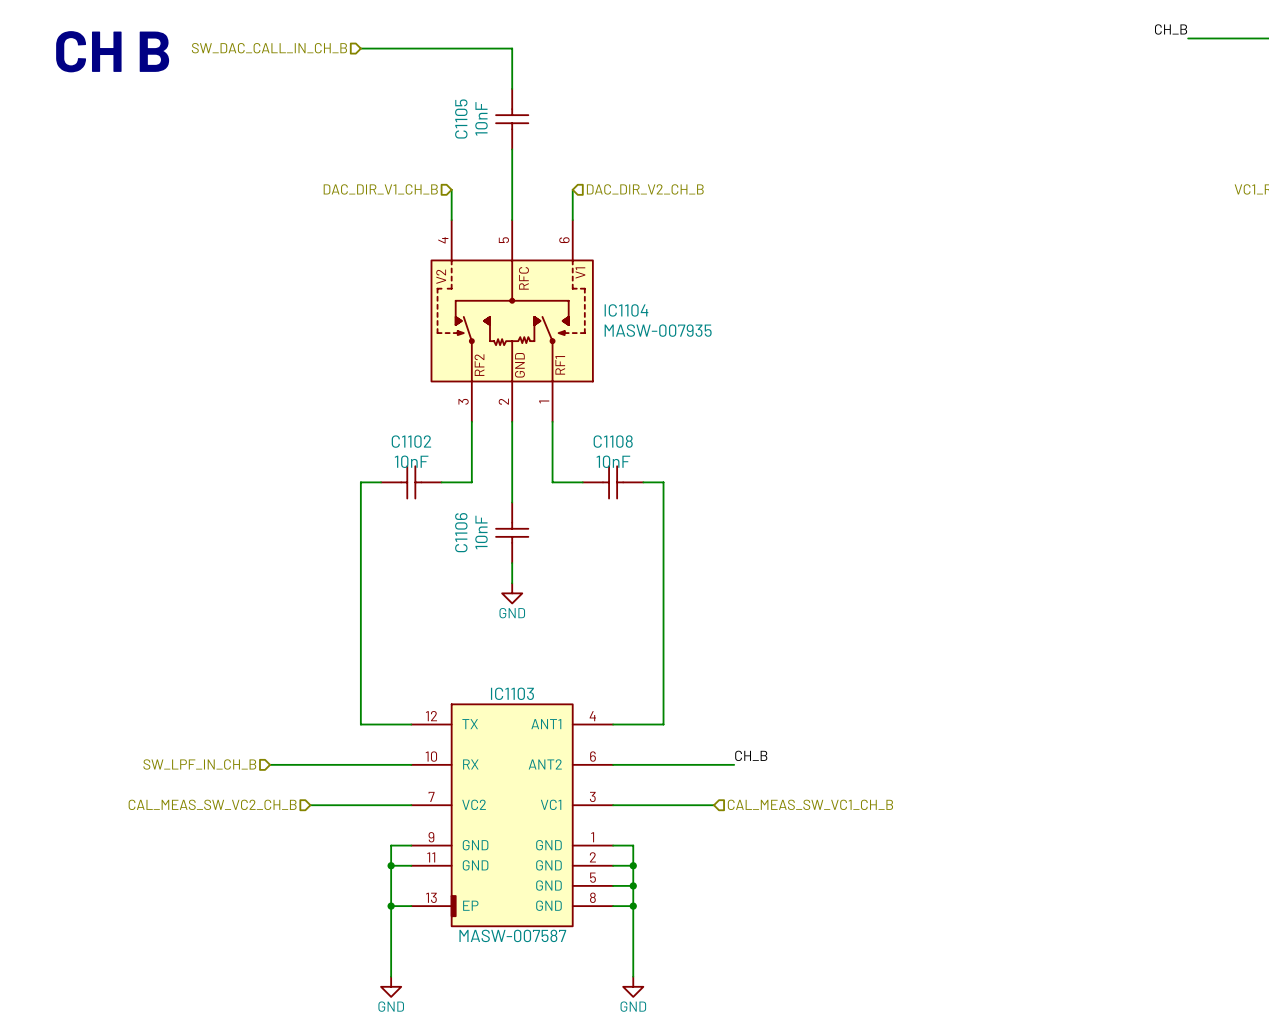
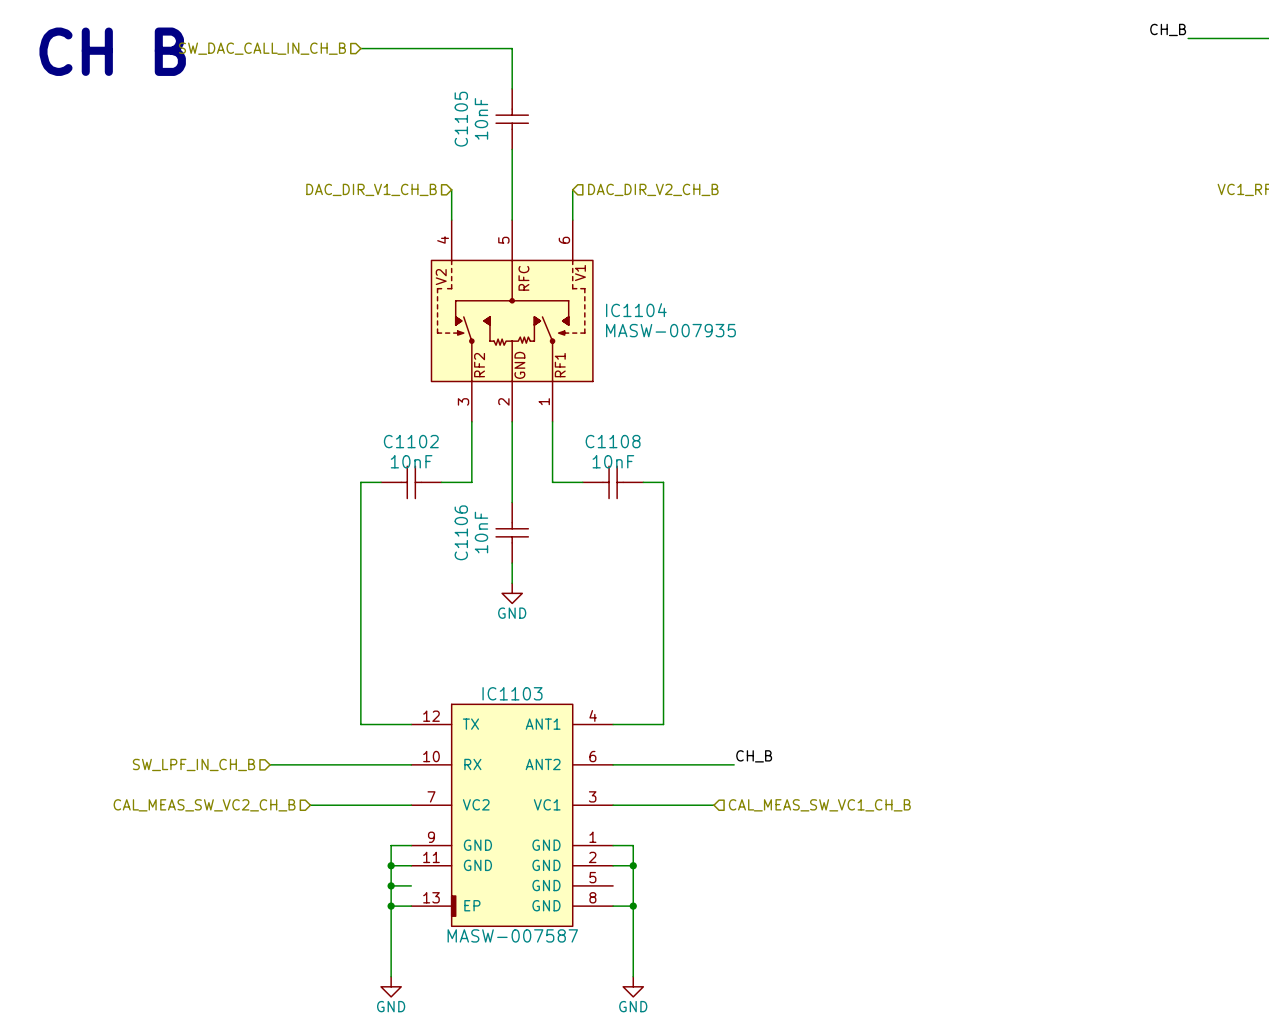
wire: none -> (391, 885) (411, 885)
junction: none -> (391, 885)
wire: (613, 885) (633, 885) -> none
junction: (633, 885) -> none

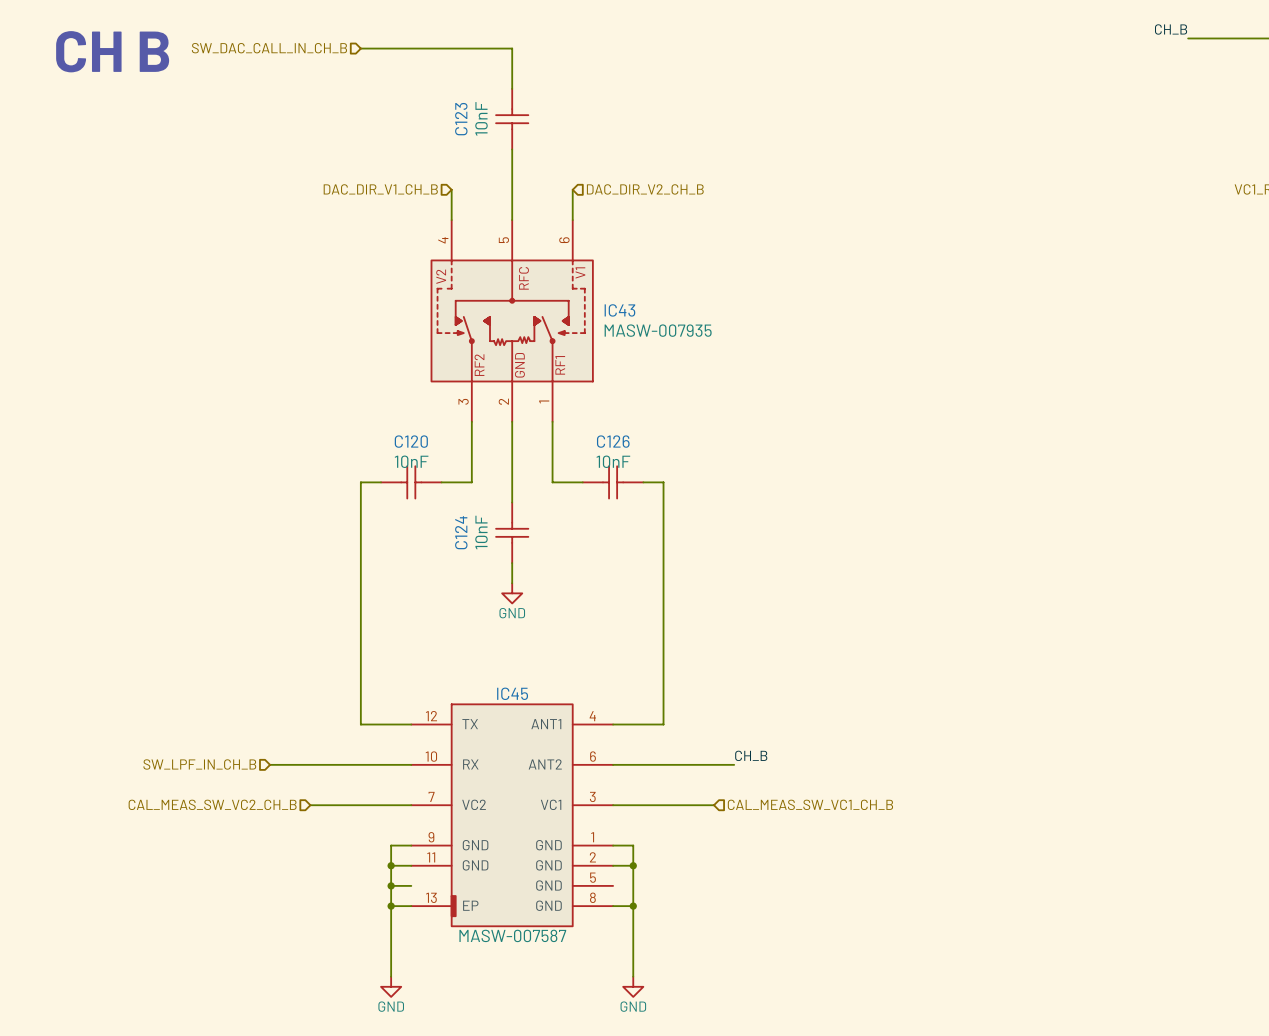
C1105 name: C1105 (461, 119) -> C123 (461, 119)
IC1104 name: IC1104 (636, 310) -> IC43 (619, 310)
C1102 name: C1102 (411, 441) -> C120 (411, 441)
C1108 name: C1108 (613, 441) -> C126 (613, 441)
C1106 name: C1106 (461, 532) -> C124 (461, 532)
IC1103 name: IC1103 (512, 693) -> IC45 (512, 693)

